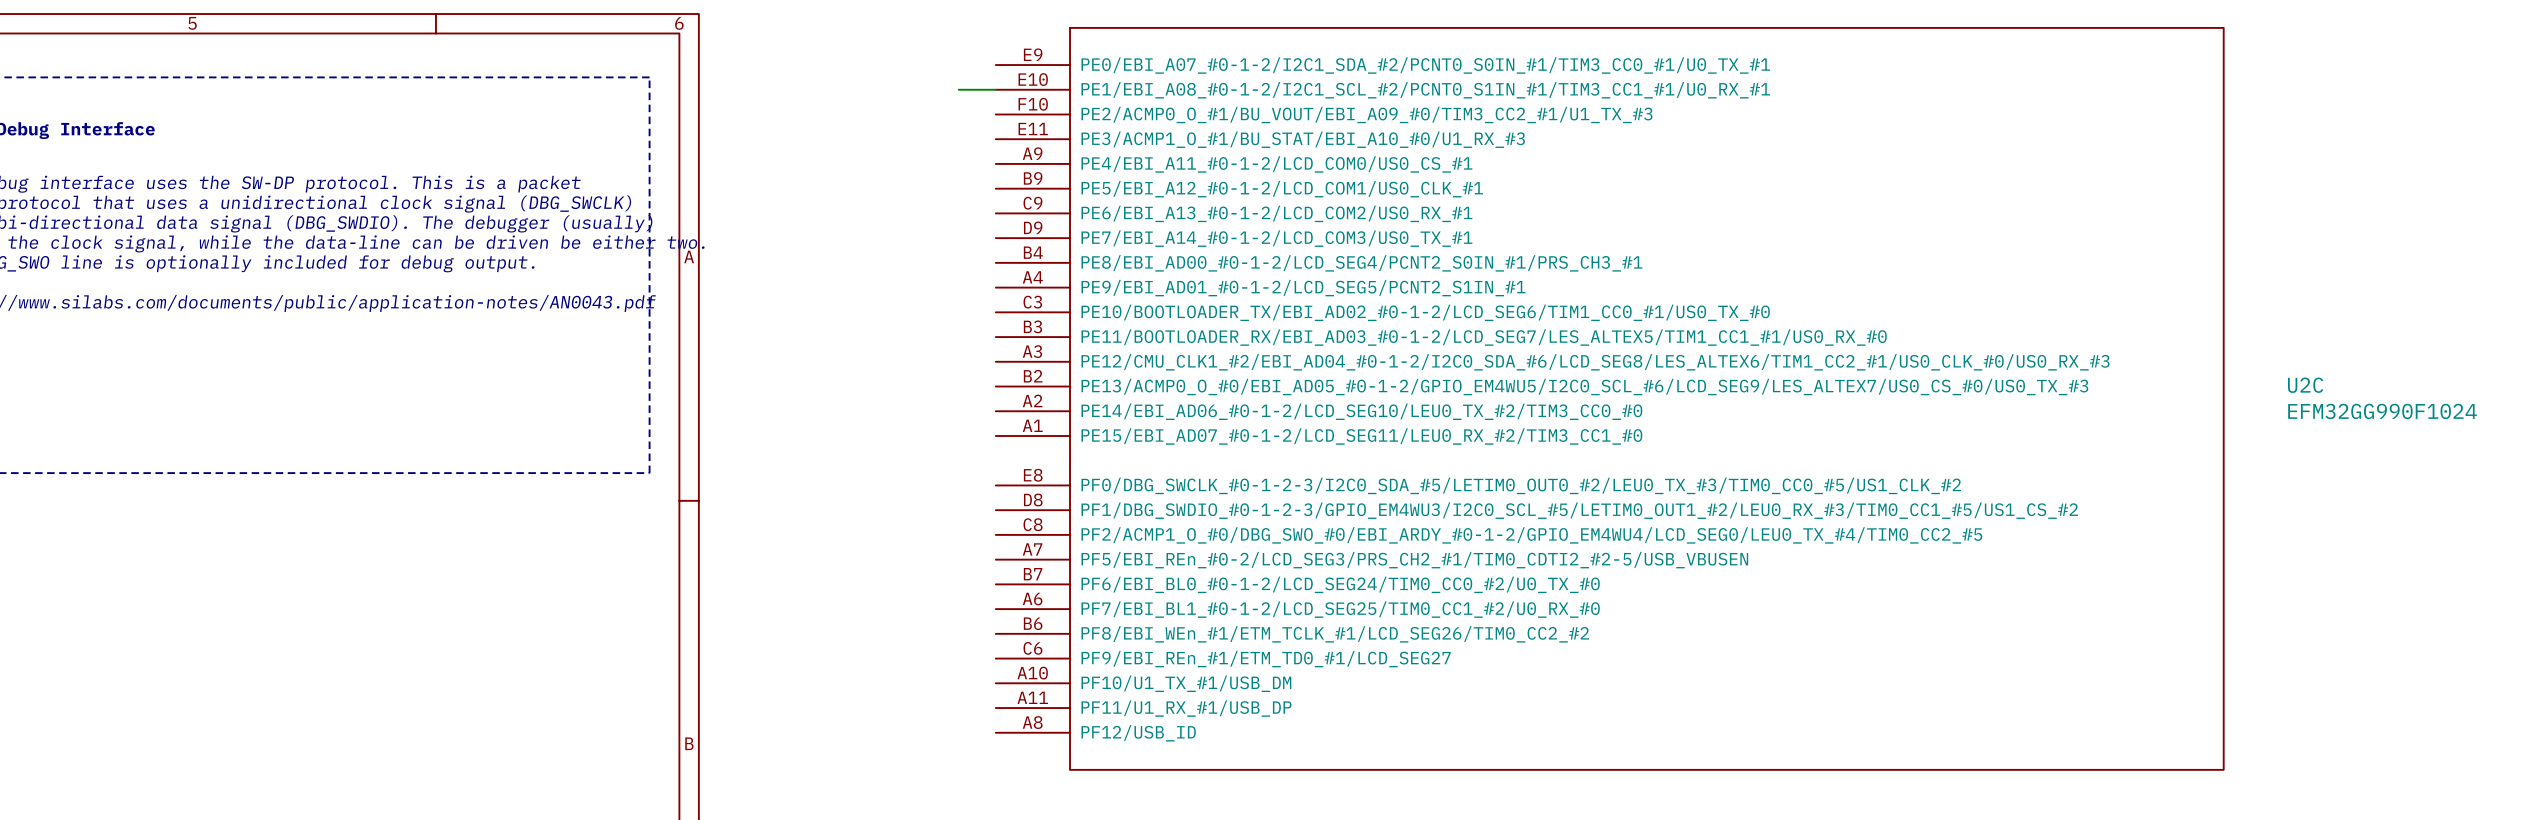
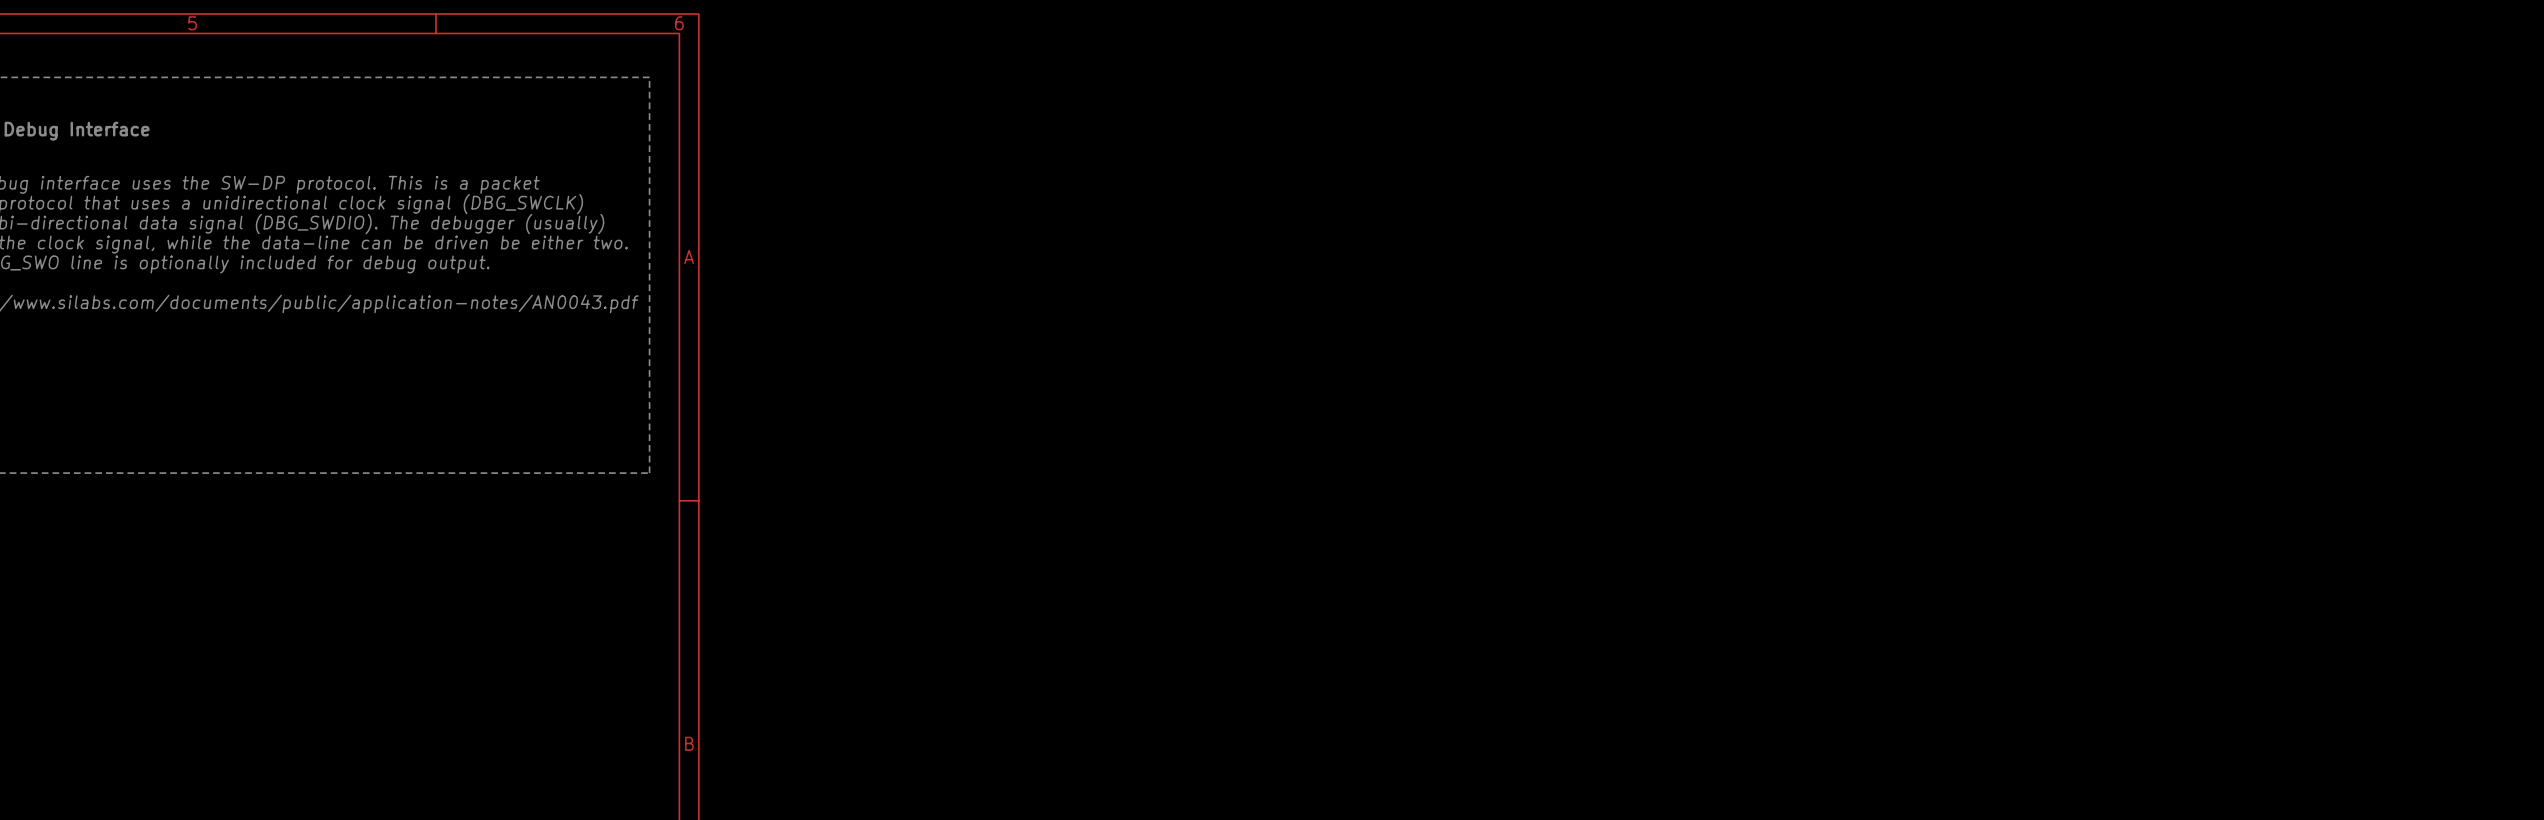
wire: (958, 89) (995, 89) -> none
U2C: EFM32GG990F1024 (1609, 398) -> none

